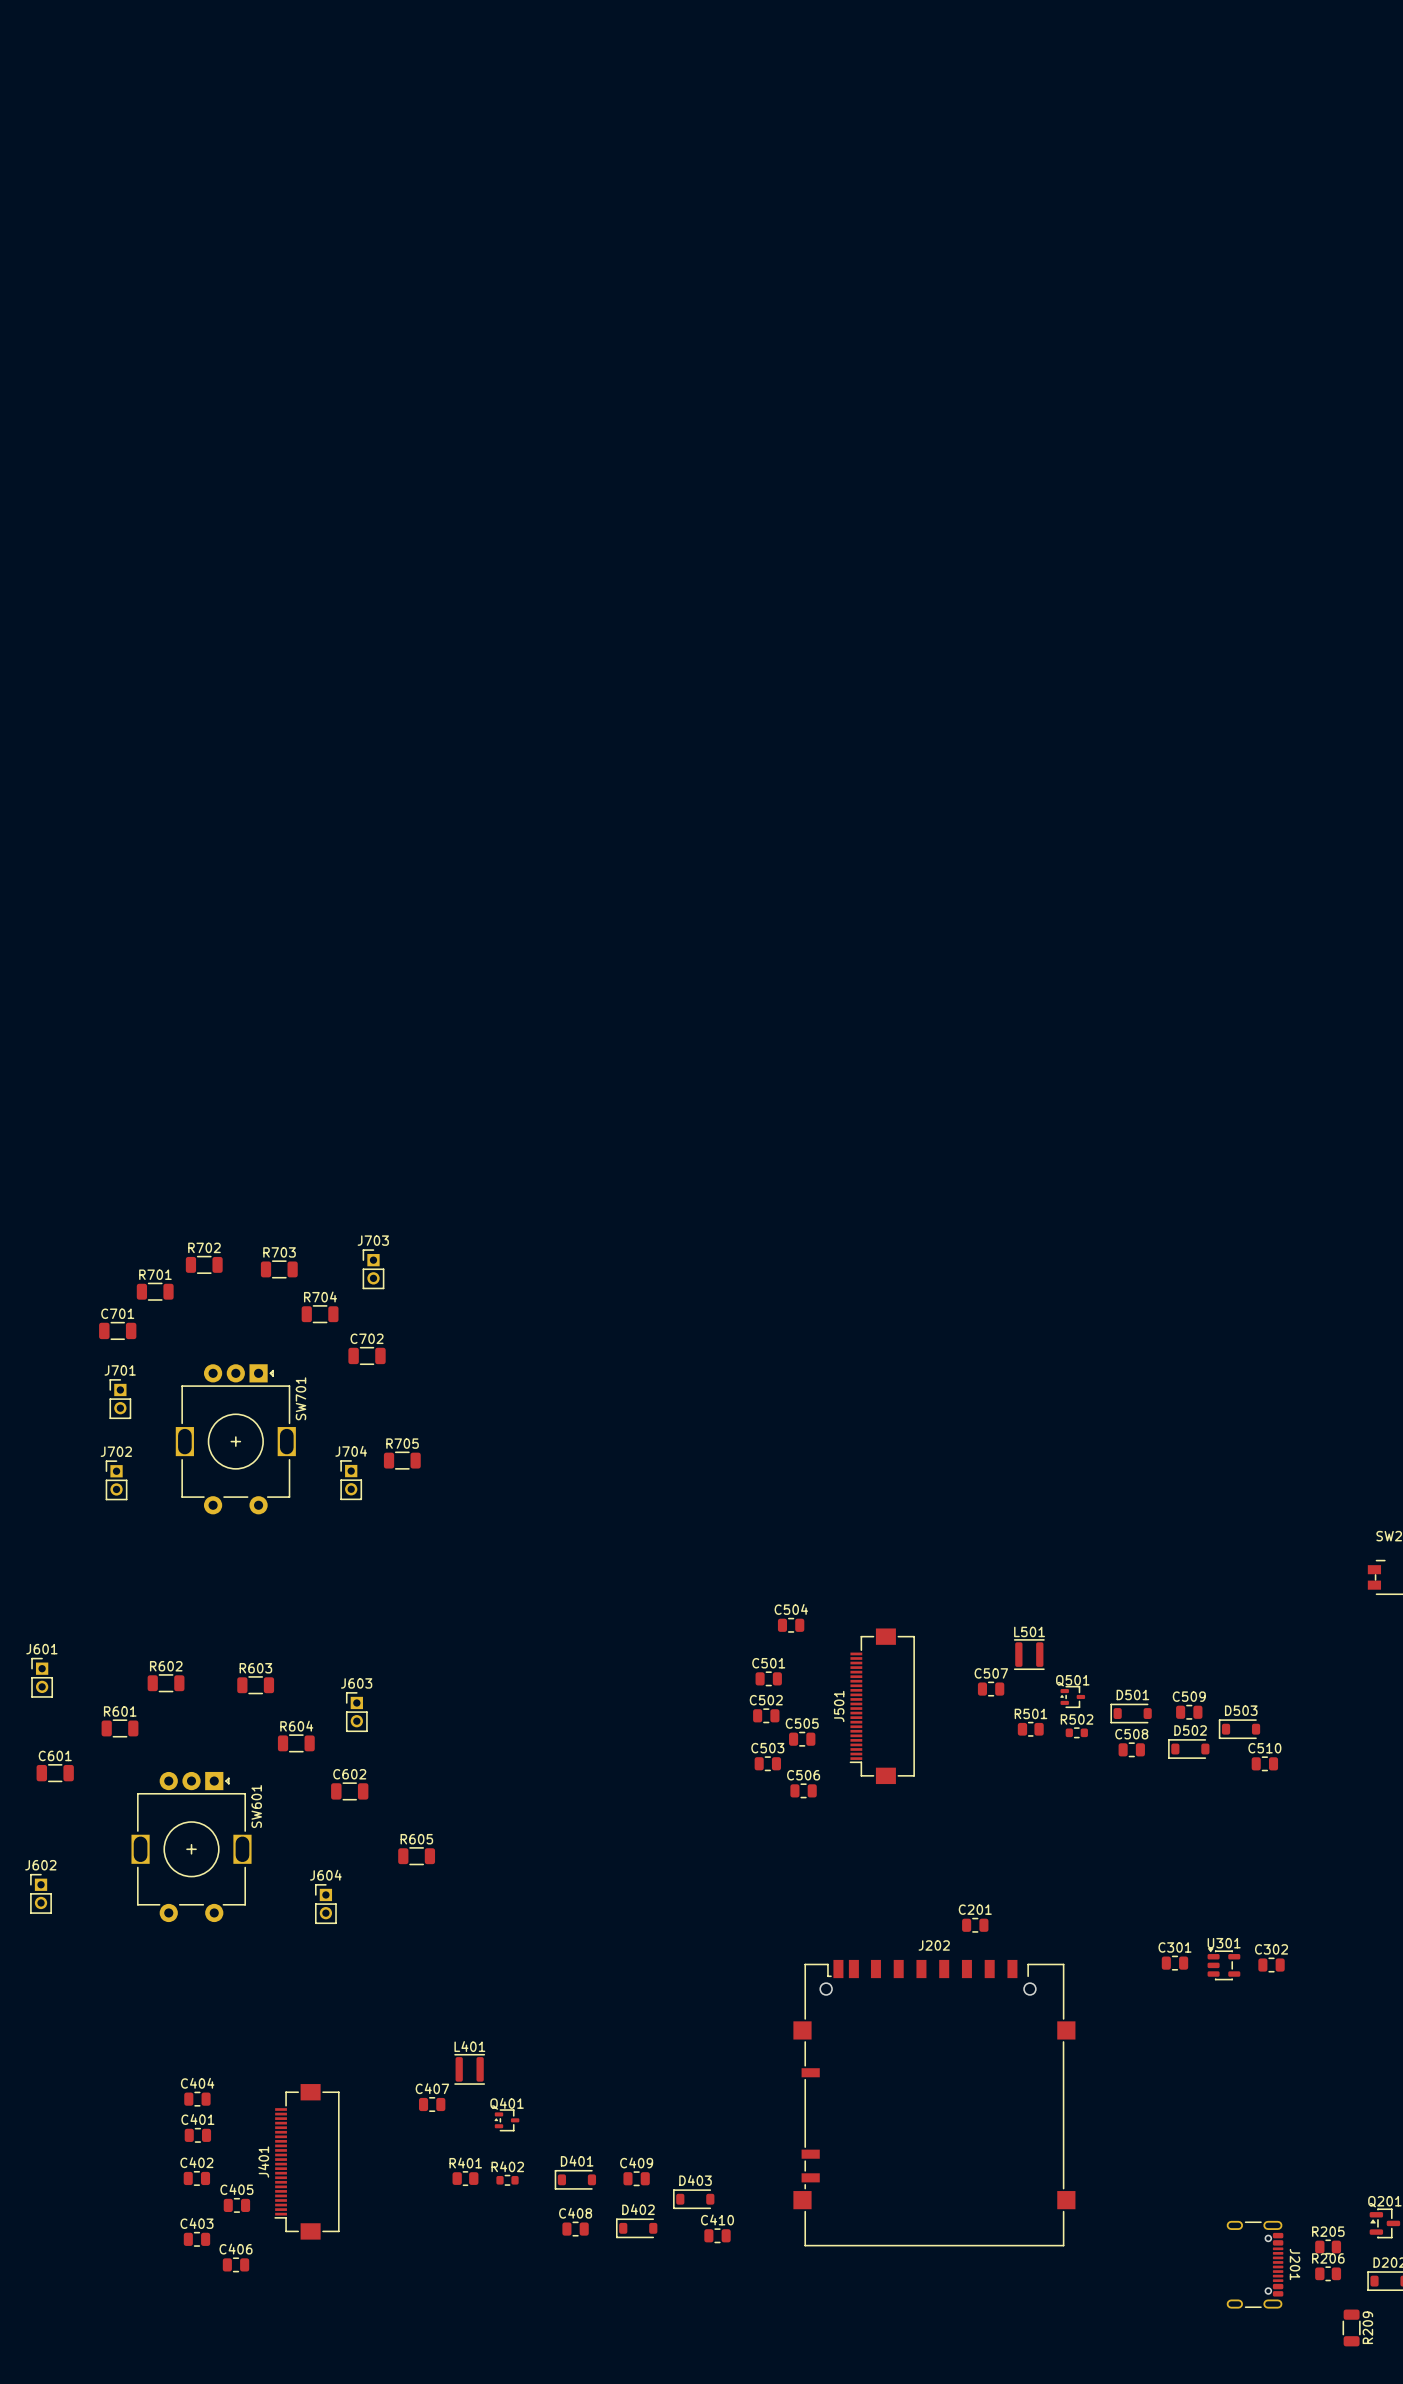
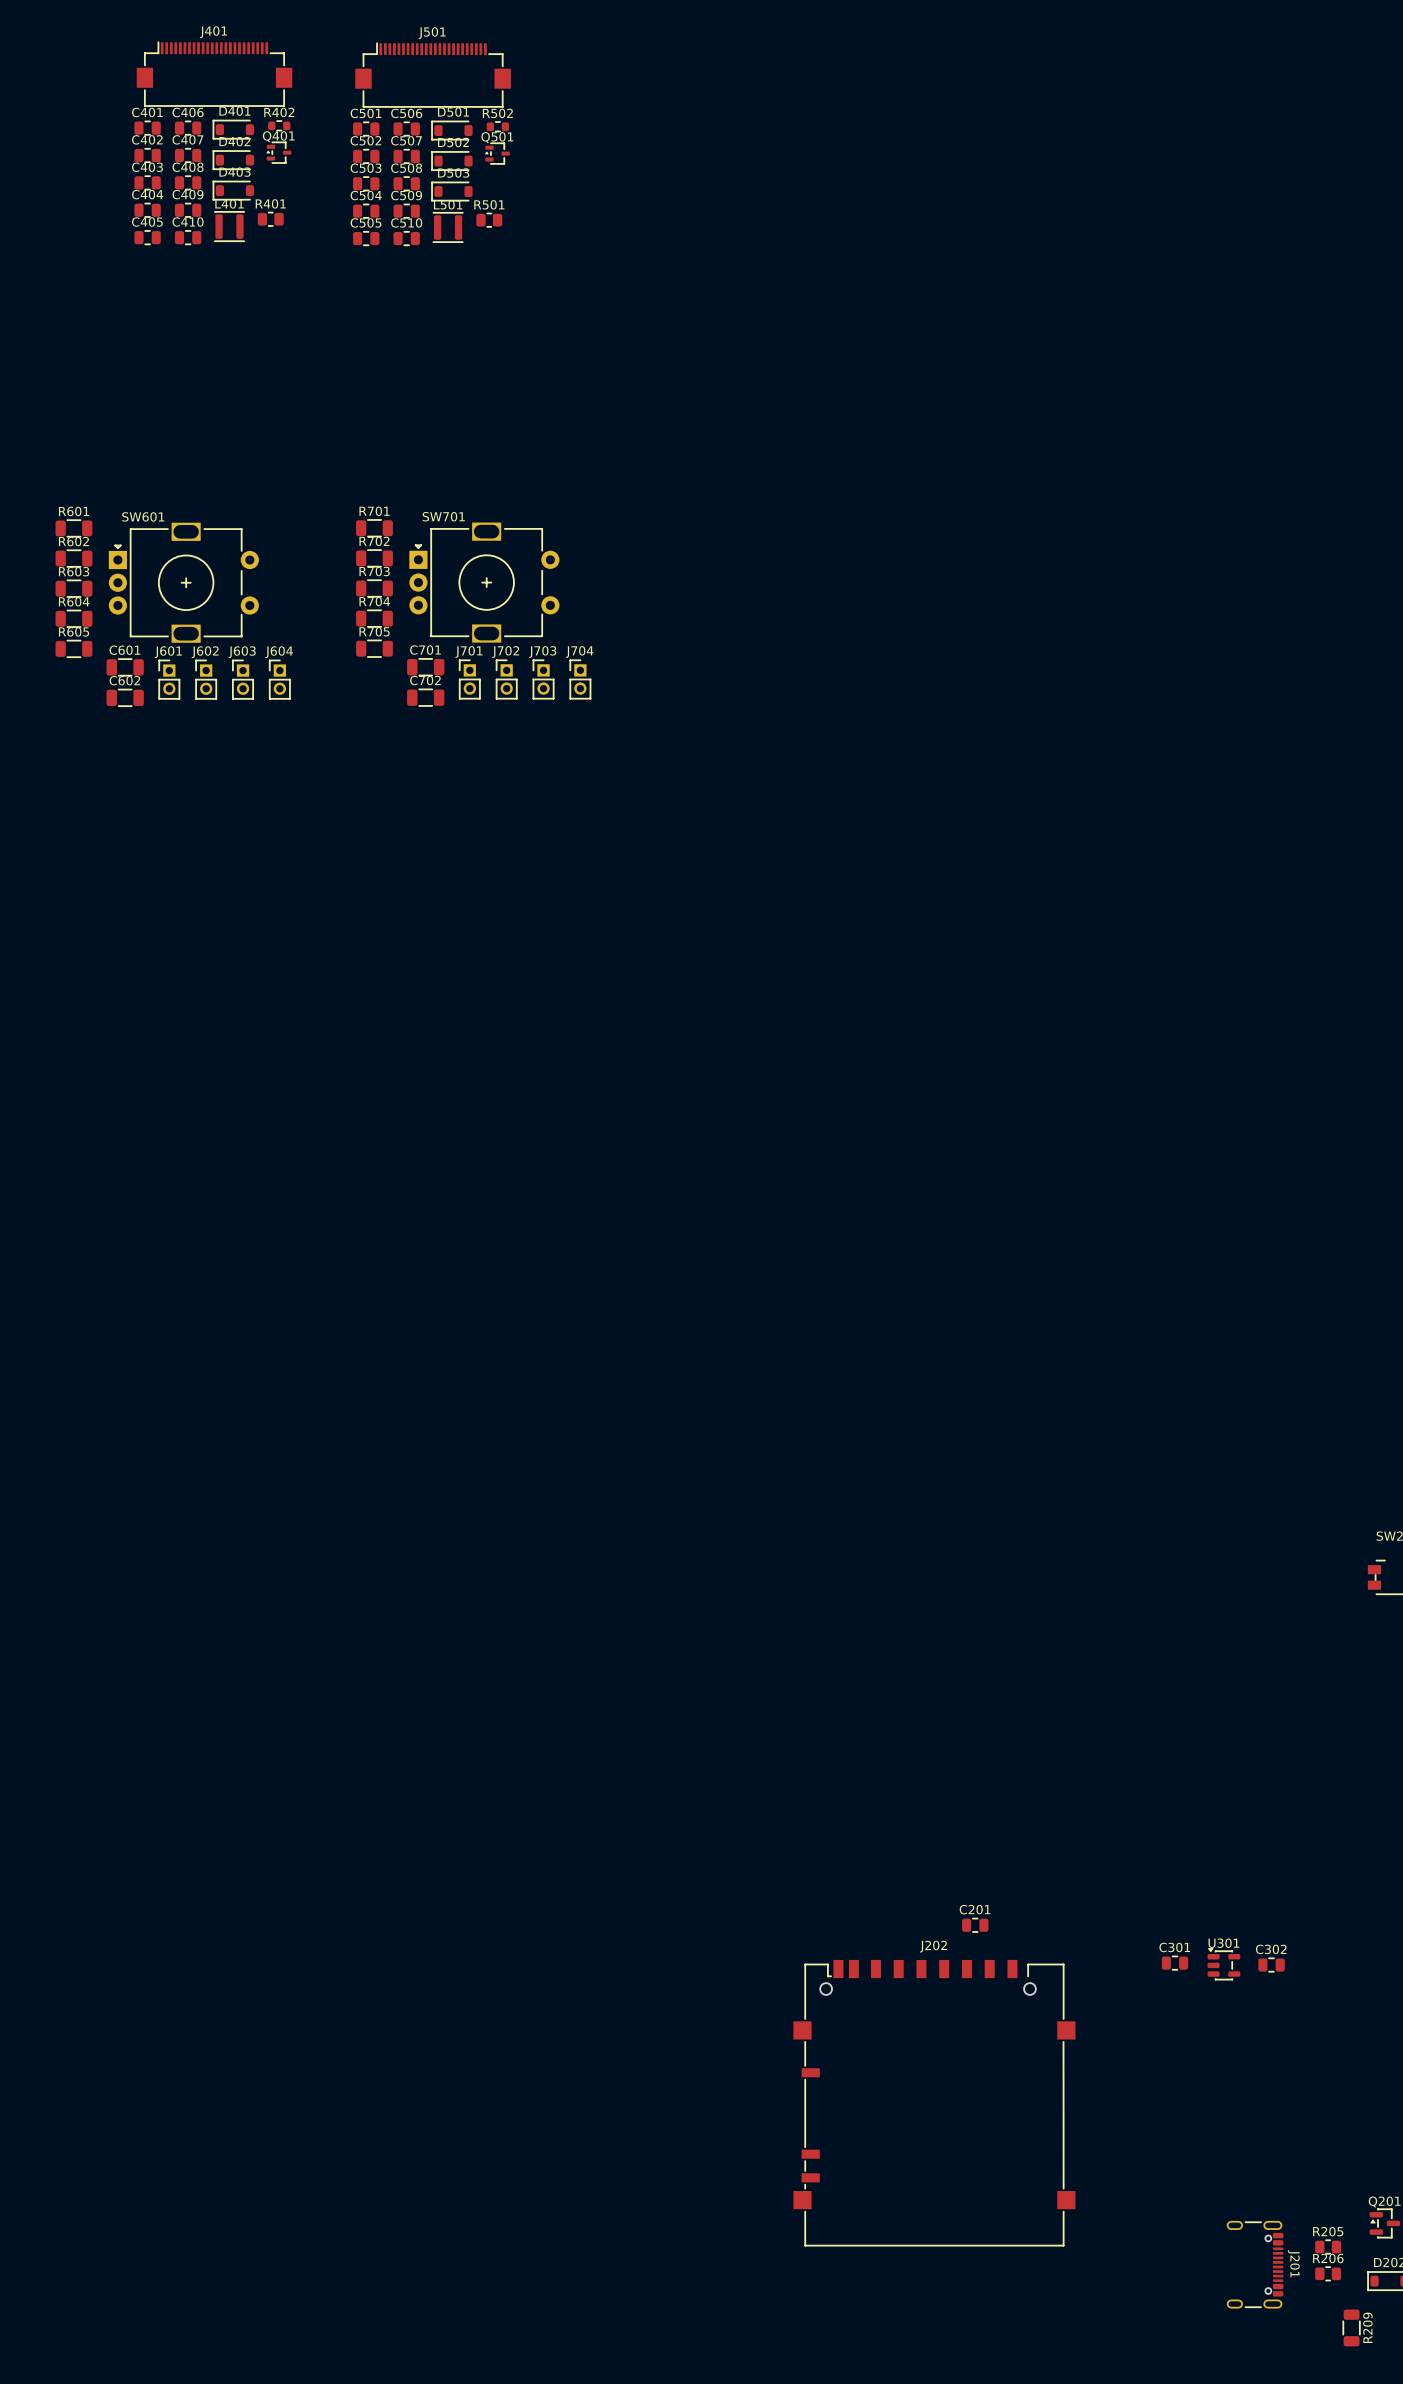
R702 position: (204, 1264) -> (374, 558)
R703 position: (279, 1269) -> (374, 588)
J703 position: (373, 1269) -> (543, 679)
R701 position: (155, 1291) -> (374, 528)
R704 position: (320, 1314) -> (374, 618)
C701 position: (117, 1330) -> (425, 667)
C702 position: (367, 1355) -> (425, 697)
J701 position: (120, 1399) -> (469, 679)
SW701 rotation: 0° (235, 1439) -> 90° counterclockwise (484, 582)
SW701 position: (235, 1439) -> (484, 582)
R705 position: (402, 1460) -> (374, 648)
J702 position: (116, 1480) -> (506, 679)
J704 position: (351, 1480) -> (580, 679)
C504 position: (791, 1625) -> (366, 211)
L501 position: (1029, 1654) -> (448, 227)
J601 position: (42, 1677) -> (169, 679)
C501 position: (768, 1678) -> (366, 129)
R602 position: (166, 1683) -> (73, 558)
R603 position: (255, 1685) -> (73, 588)
C507 position: (991, 1689) -> (406, 156)
Q501 position: (1072, 1696) -> (497, 153)
J501 rotation: 0° (882, 1706) -> 90° clockwise (433, 75)
J501 position: (882, 1706) -> (433, 75)
J603 position: (356, 1712) -> (243, 679)
C509 position: (1189, 1712) -> (406, 211)
D501 position: (1131, 1713) -> (452, 130)
C502 position: (766, 1715) -> (366, 156)
R601 position: (120, 1728) -> (73, 528)
R501 position: (1030, 1729) -> (489, 220)
D503 position: (1239, 1729) -> (452, 191)
R502 position: (1076, 1732) -> (497, 126)
C505 position: (802, 1739) -> (366, 238)
R604 position: (296, 1743) -> (73, 618)
C508 position: (1131, 1749) -> (406, 183)
D502 position: (1188, 1749) -> (452, 161)
C503 position: (767, 1763) -> (366, 183)
C510 position: (1264, 1763) -> (406, 238)
C601 position: (55, 1773) -> (125, 667)
C506 position: (803, 1790) -> (406, 129)
C602 position: (349, 1791) -> (125, 697)
SW601 rotation: 0° (191, 1847) -> 90° counterclockwise (183, 582)
SW601 position: (191, 1847) -> (183, 582)
R605 position: (416, 1856) -> (73, 648)
J602 position: (41, 1893) -> (206, 679)
J604 position: (325, 1904) -> (279, 679)
L401 position: (469, 2069) -> (229, 226)
C404 position: (197, 2099) -> (147, 210)
C407 position: (432, 2104) -> (188, 155)
Q401 position: (506, 2120) -> (278, 152)
C401 position: (197, 2135) -> (147, 128)
J401 rotation: 0° (306, 2161) -> 90° clockwise (214, 74)
J401 position: (306, 2161) -> (214, 74)
C402 position: (196, 2178) -> (147, 155)
R401 position: (465, 2178) -> (270, 219)
C409 position: (636, 2178) -> (188, 210)
D401 position: (575, 2179) -> (233, 129)
R402 position: (507, 2180) -> (279, 125)
D403 position: (693, 2199) -> (233, 190)
C405 position: (236, 2205) -> (147, 237)
D402 position: (636, 2228) -> (233, 160)
C408 position: (575, 2229) -> (188, 182)
C410 position: (717, 2235) -> (188, 237)
C403 position: (196, 2239) -> (147, 182)
C406 position: (236, 2264) -> (188, 128)

